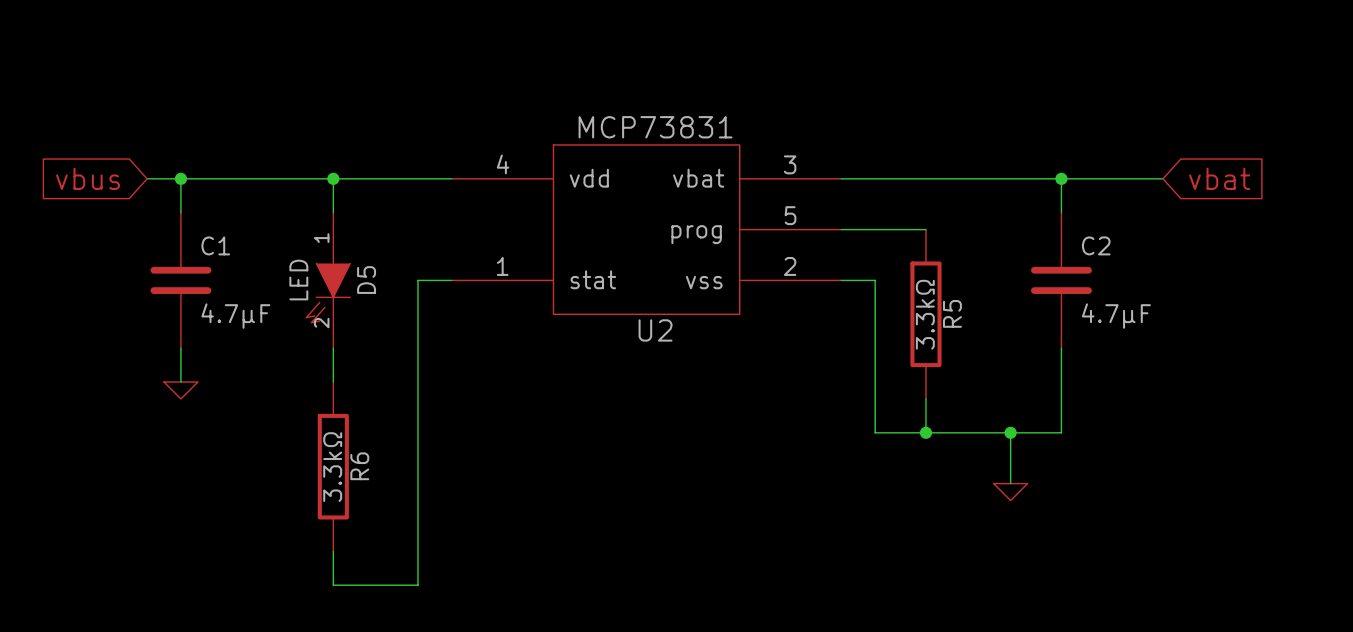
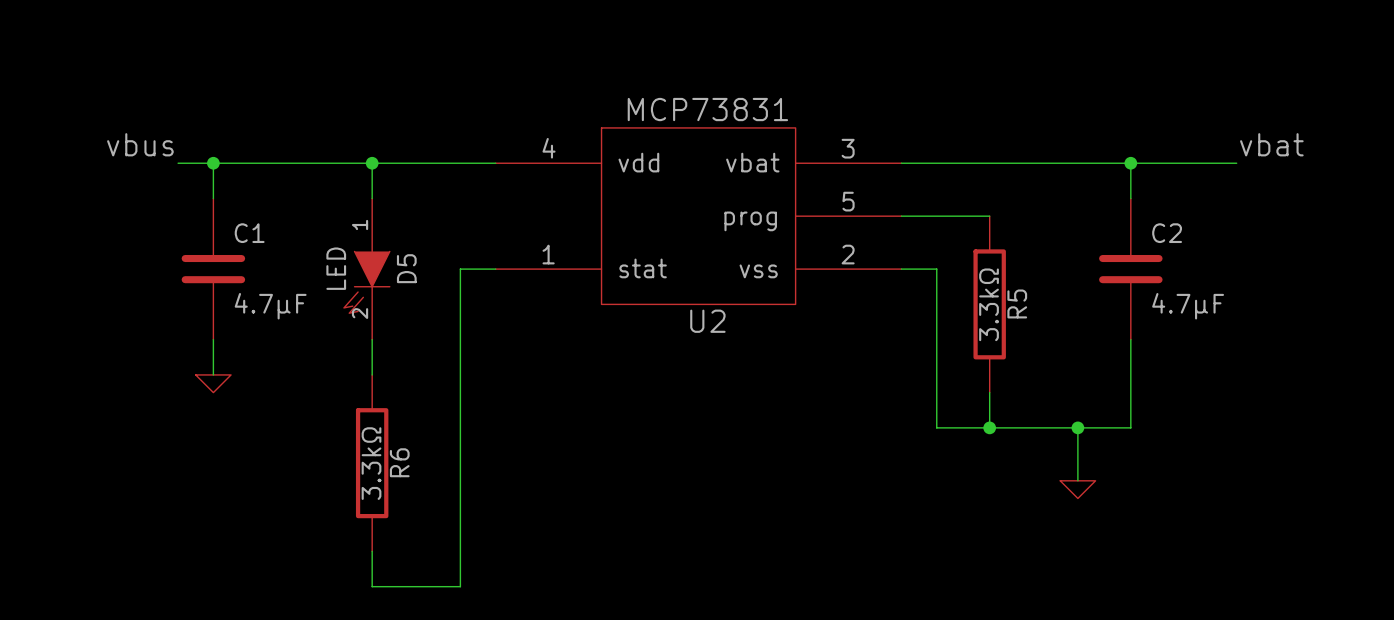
label: none -> vbus (140, 144)
label: none -> vbat (1271, 144)
global label: vbus (88, 178) -> none
global label: vbat (1219, 178) -> none

